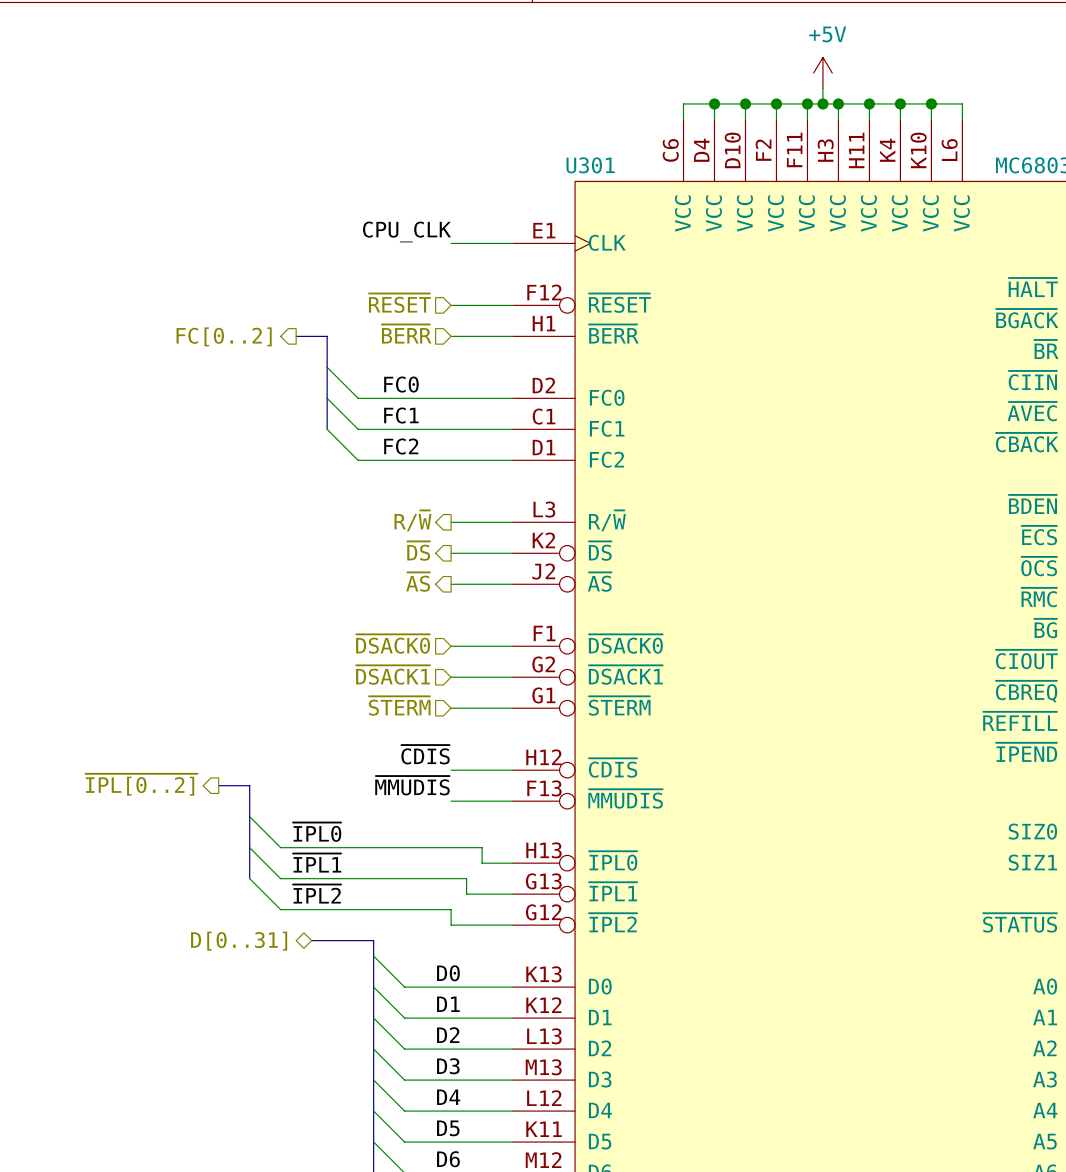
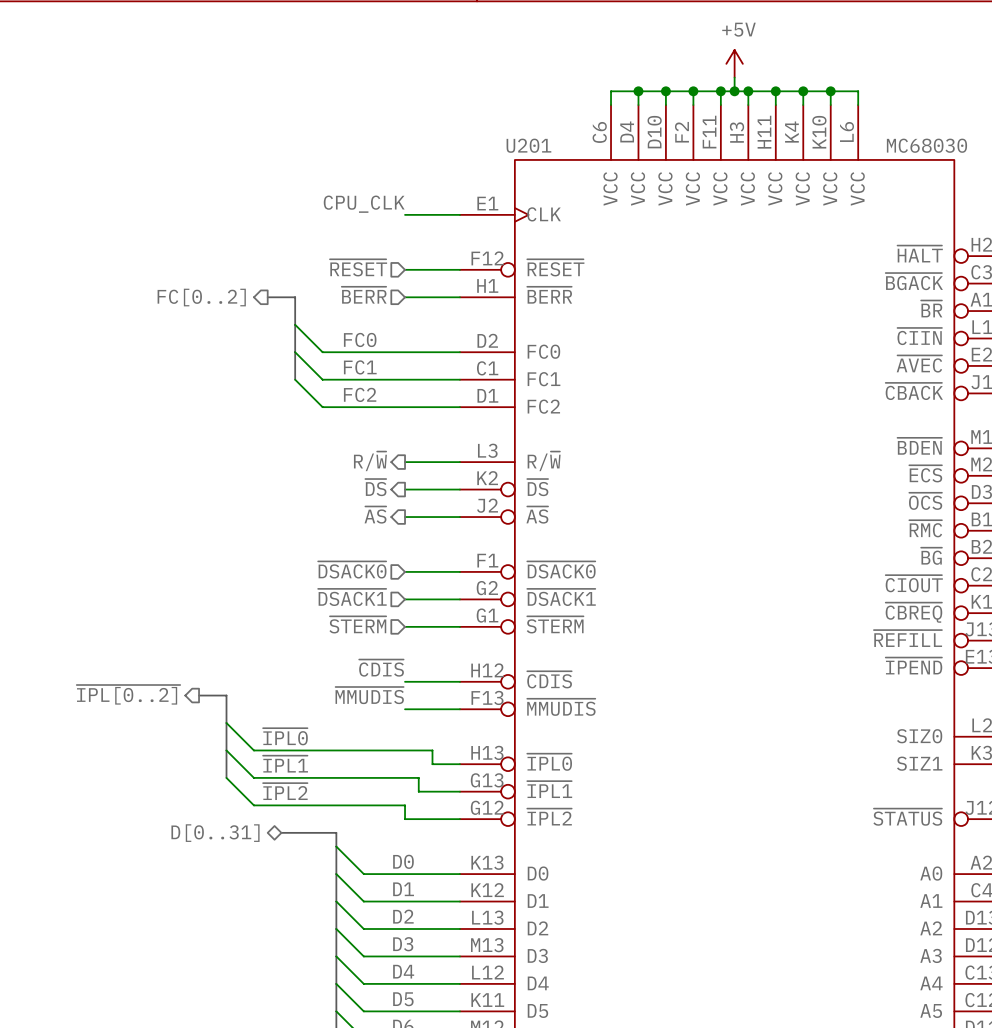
U301 name: U301 (590, 165) -> U201 (528, 145)

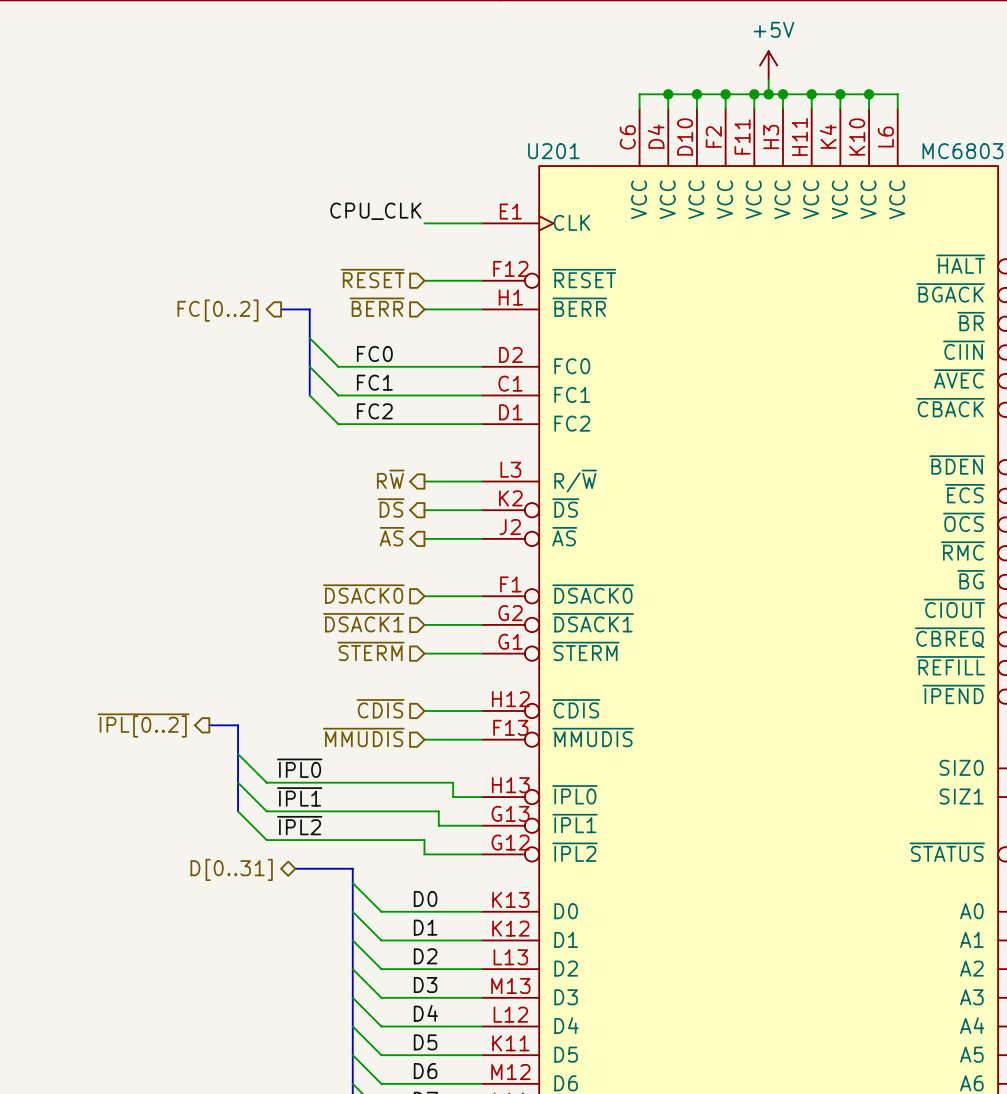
hierarchical label: R/~{W} (370, 461) -> R~{W} (390, 479)
label: ~{CDIS} (381, 668) -> none
hierarchical label: none -> ~{CDIS} (380, 708)
label: ~{MMUDIS} (369, 695) -> none
hierarchical label: none -> ~{MMUDIS} (363, 737)

